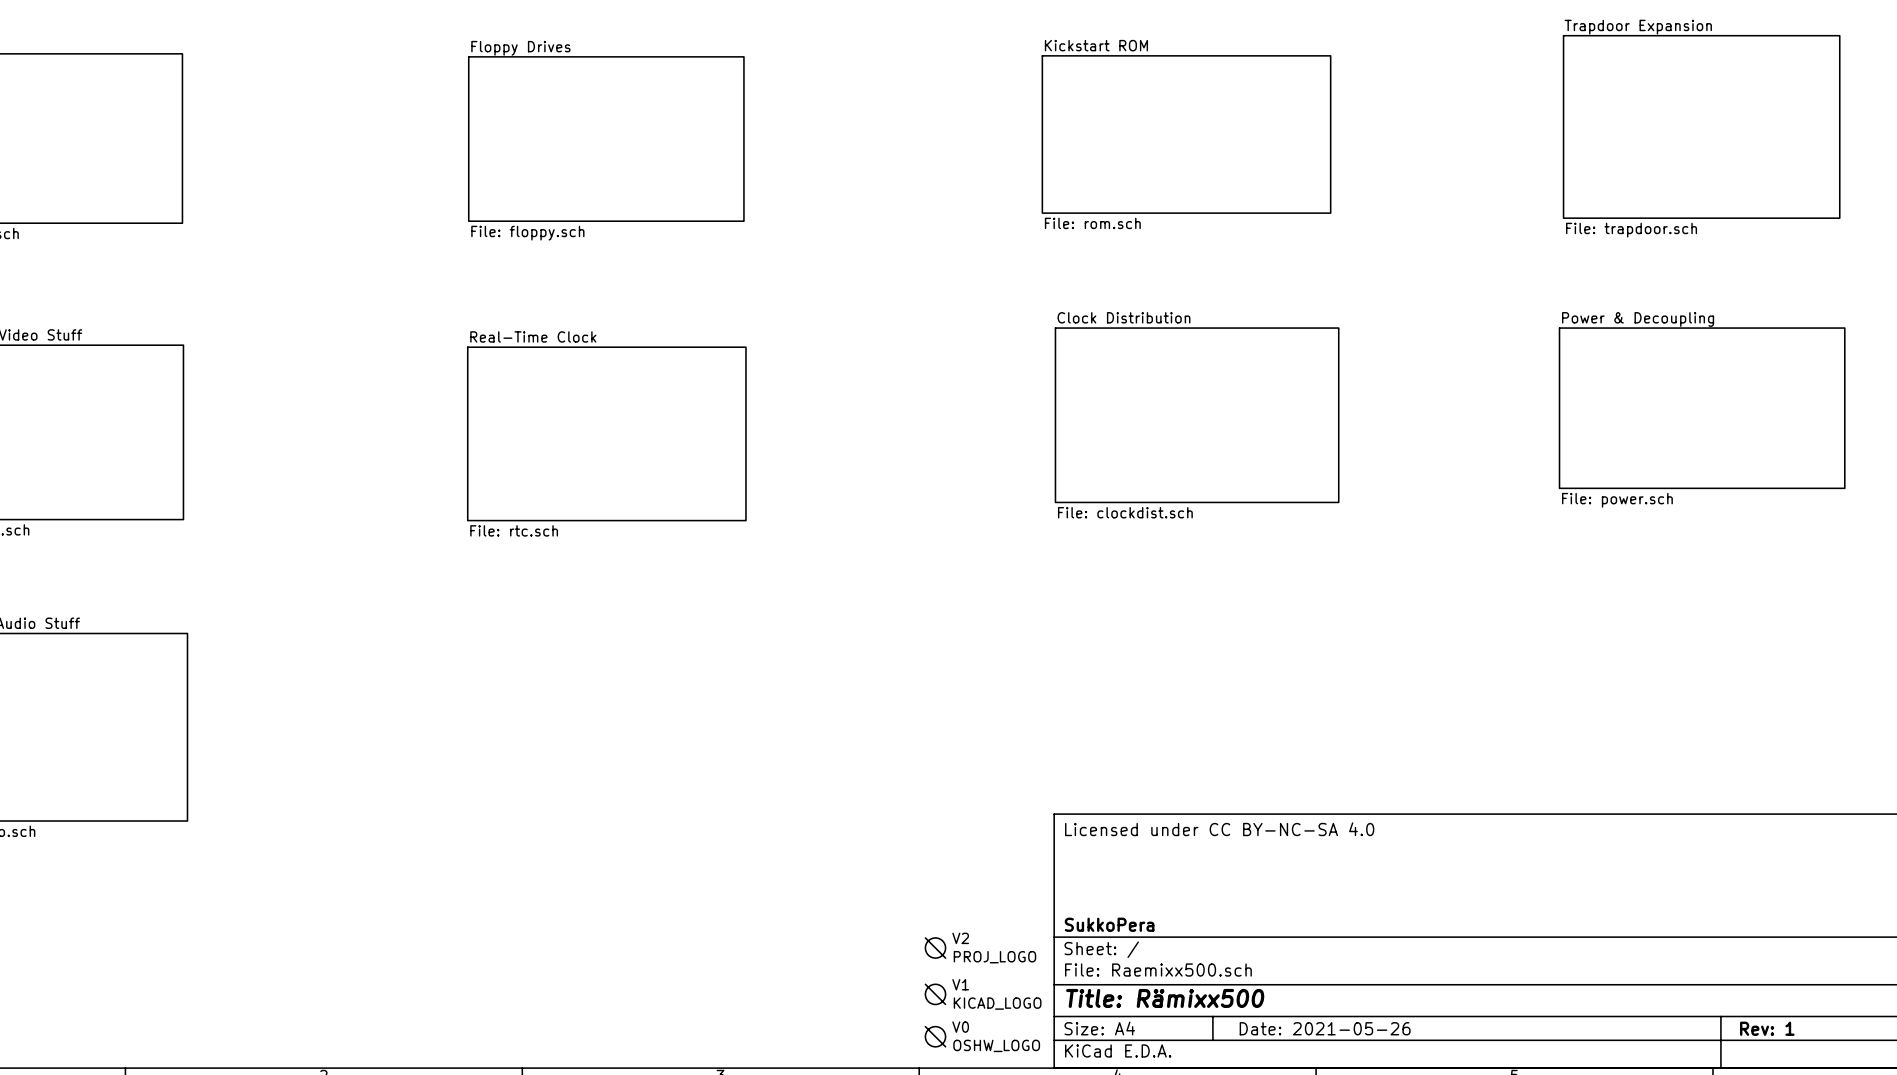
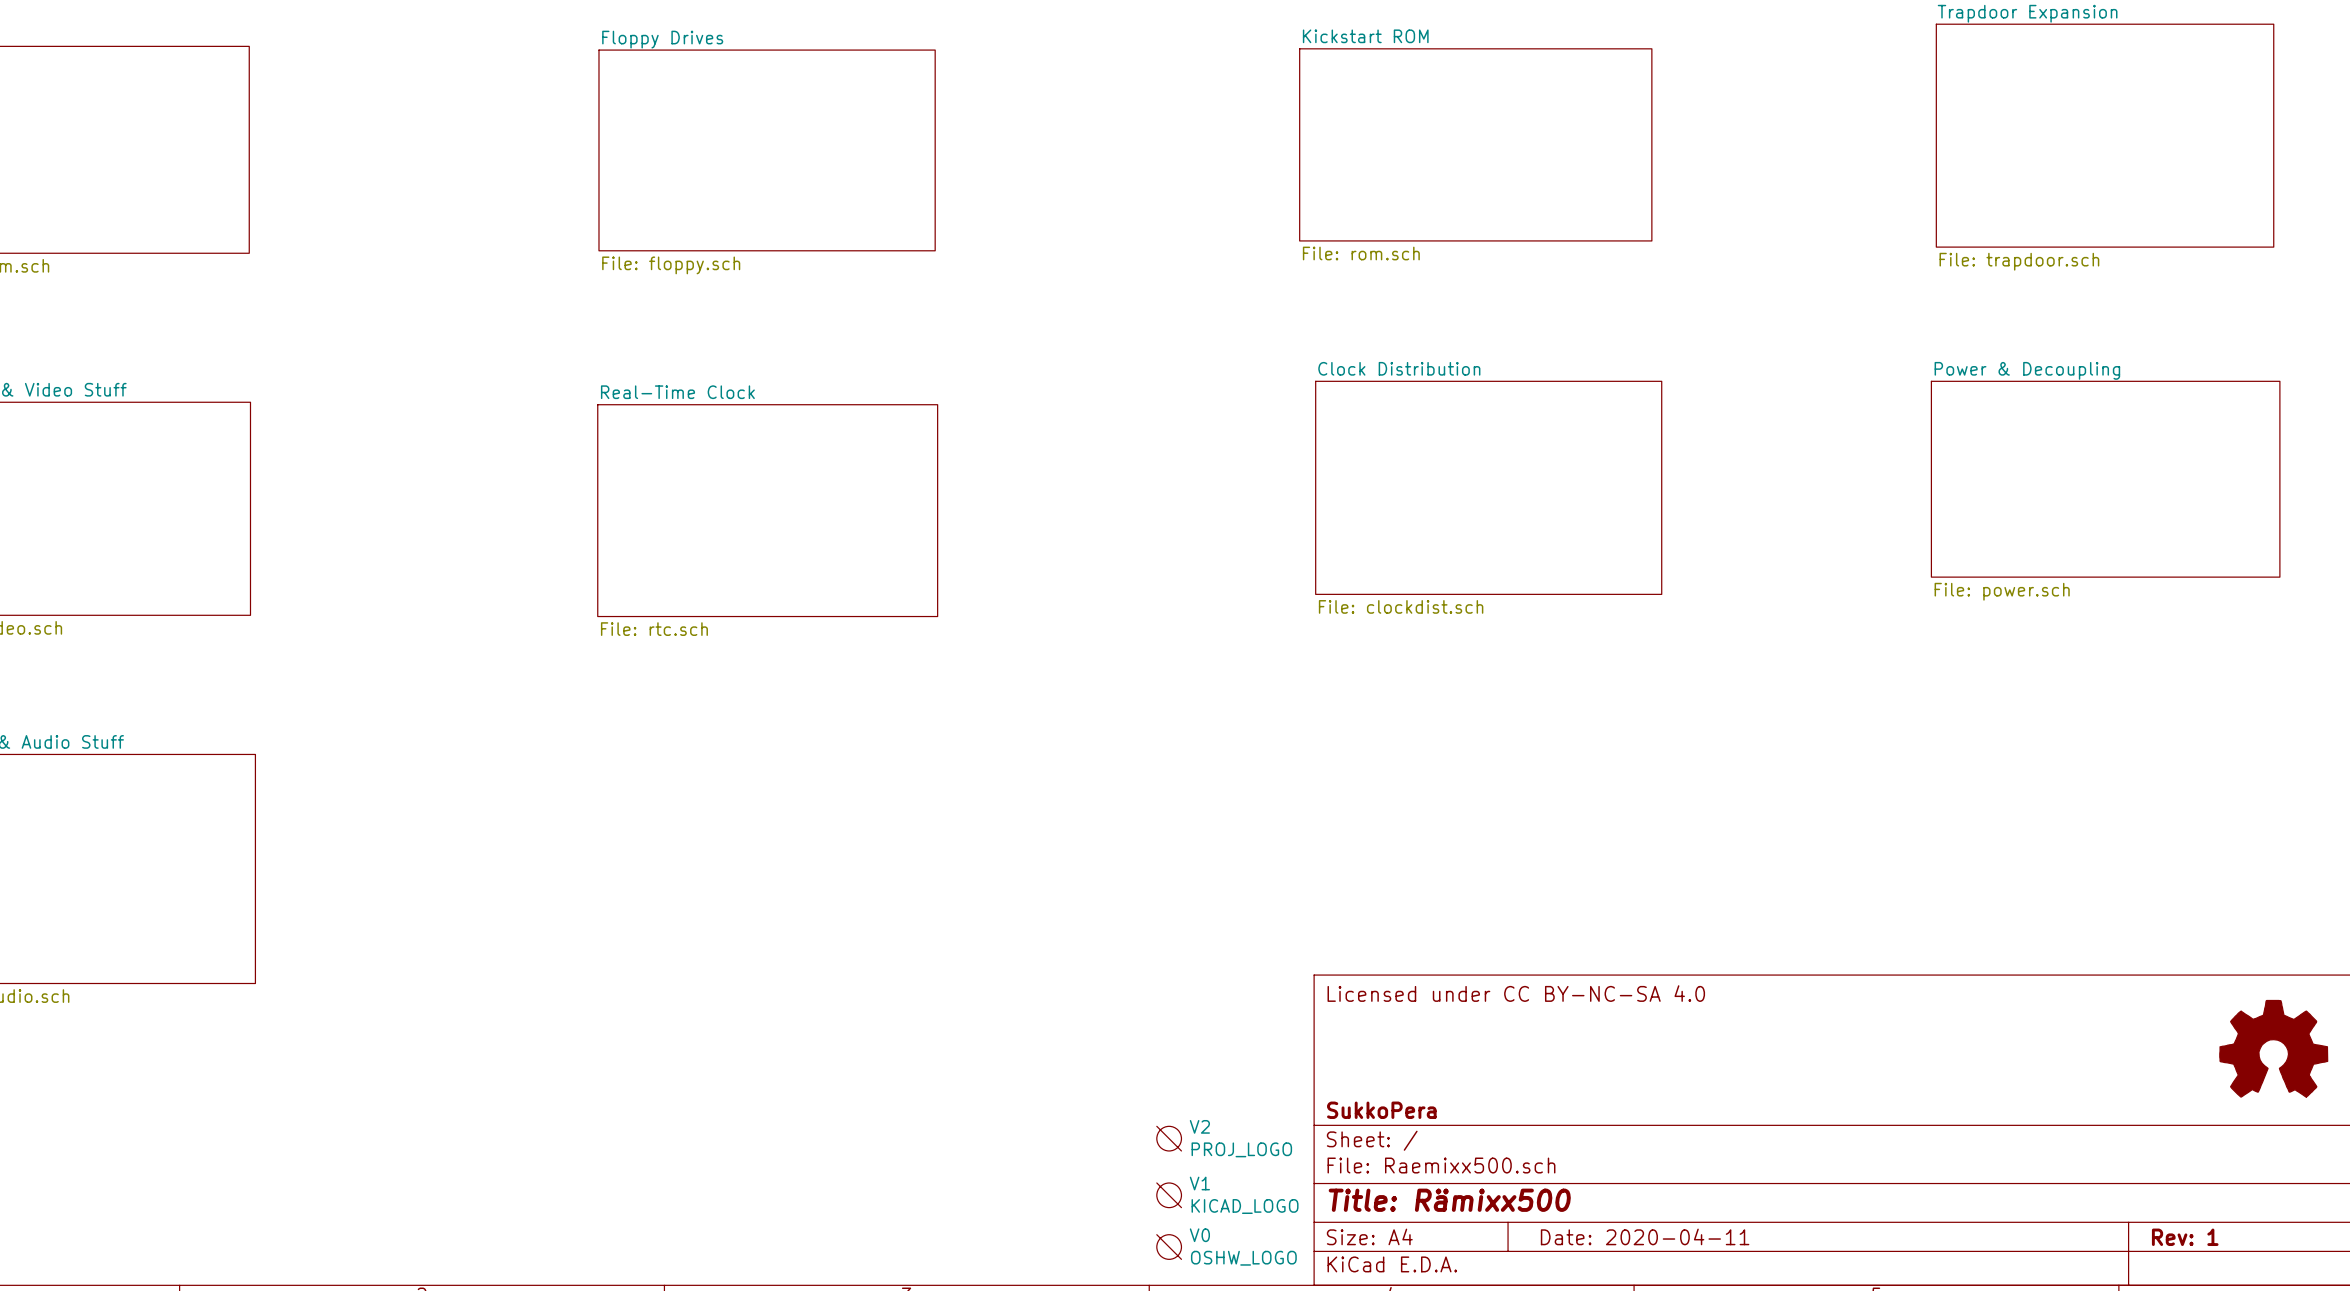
power symbol: none -> (2273, 1048)
title block: Date: 2021-05-26 (1325, 1028) -> Date: 2020-04-11 (1645, 1236)

